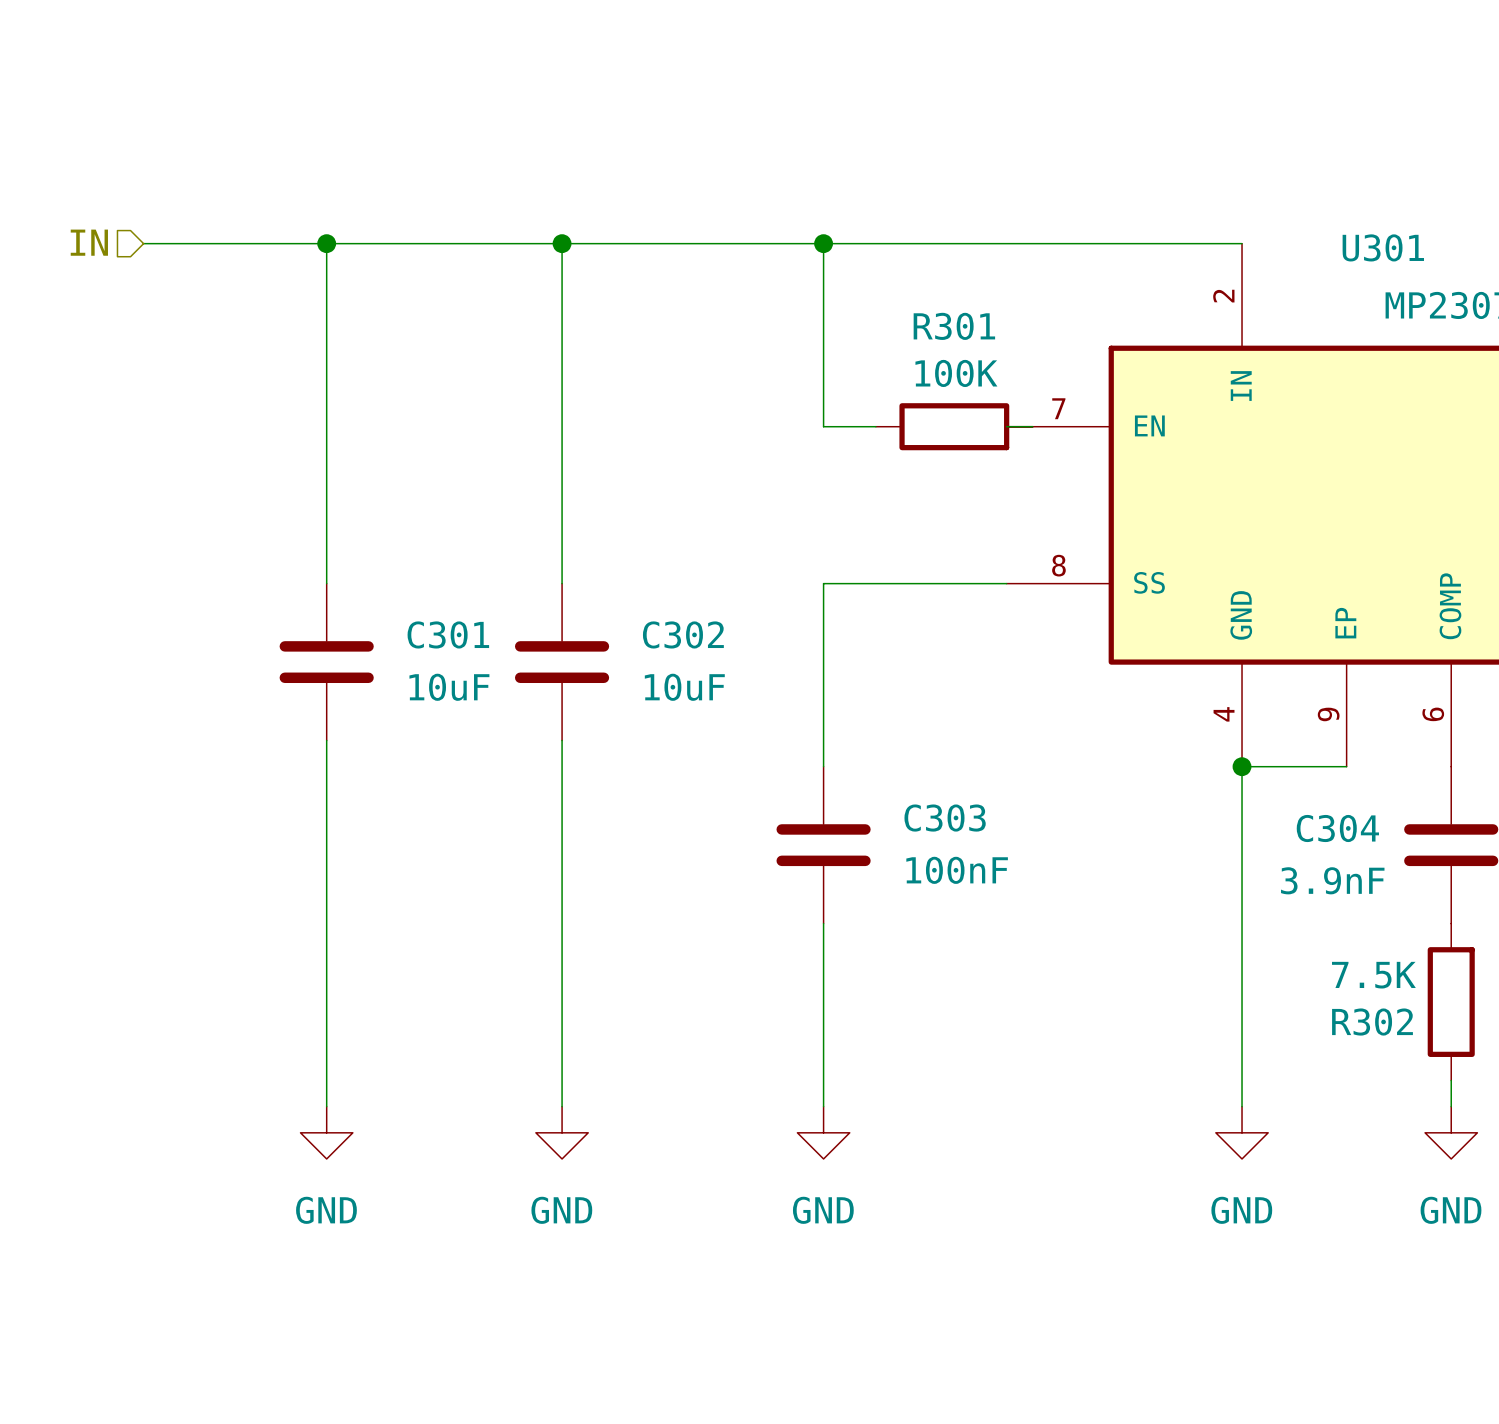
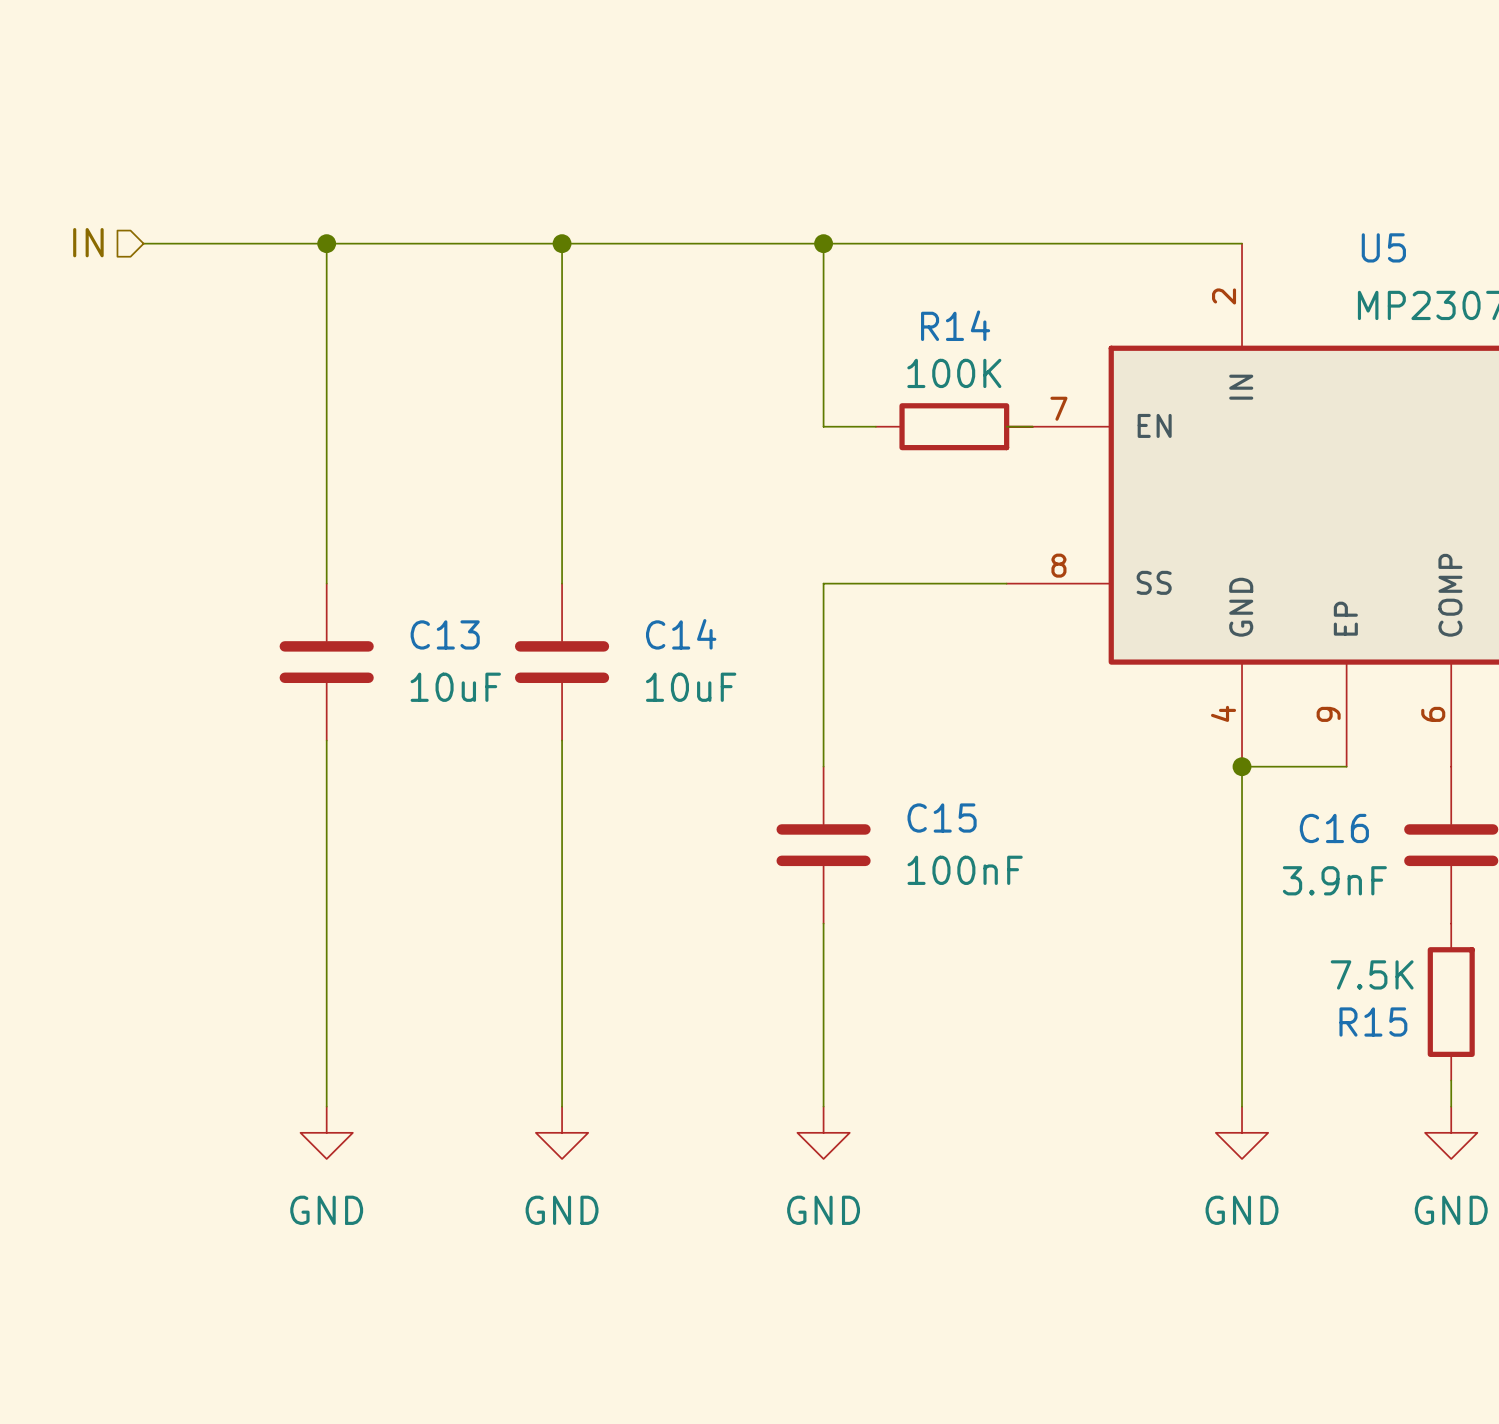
U301 name: U301 (1383, 247) -> U5 (1383, 247)
R301 name: R301 (954, 326) -> R14 (955, 325)
C301 name: C301 (448, 634) -> C13 (445, 634)
C302 name: C302 (683, 634) -> C14 (681, 634)
C303 name: C303 (945, 818) -> C15 (942, 818)
C304 name: C304 (1337, 828) -> C16 (1334, 828)
R302 name: R302 (1372, 1022) -> R15 (1373, 1022)

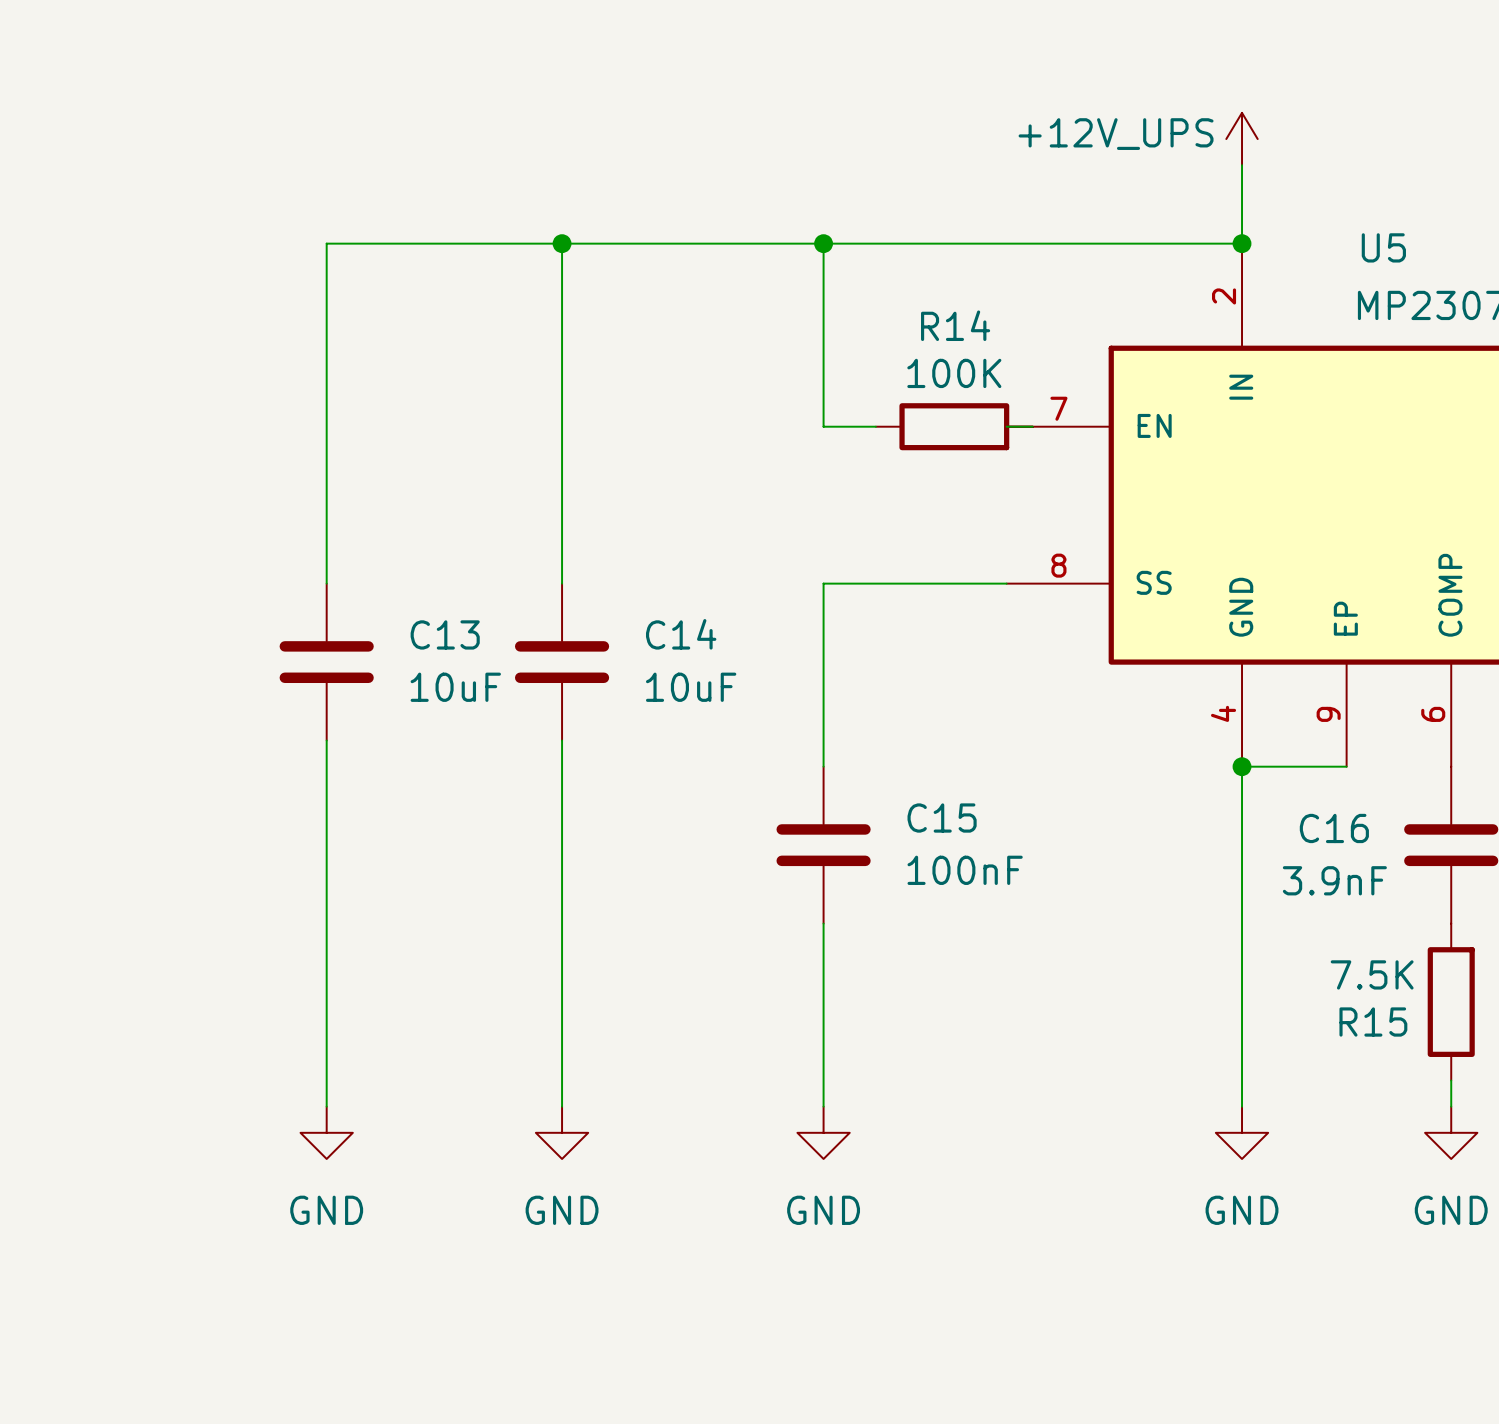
power symbol: none -> +12V_UPS (1242, 139)
wire: none -> (1242, 165) (1242, 243)
hierarchical label: IN (88, 242) -> none
wire: (143, 243) (326, 243) -> none
junction: (326, 243) -> none
junction: none -> (1242, 243)

